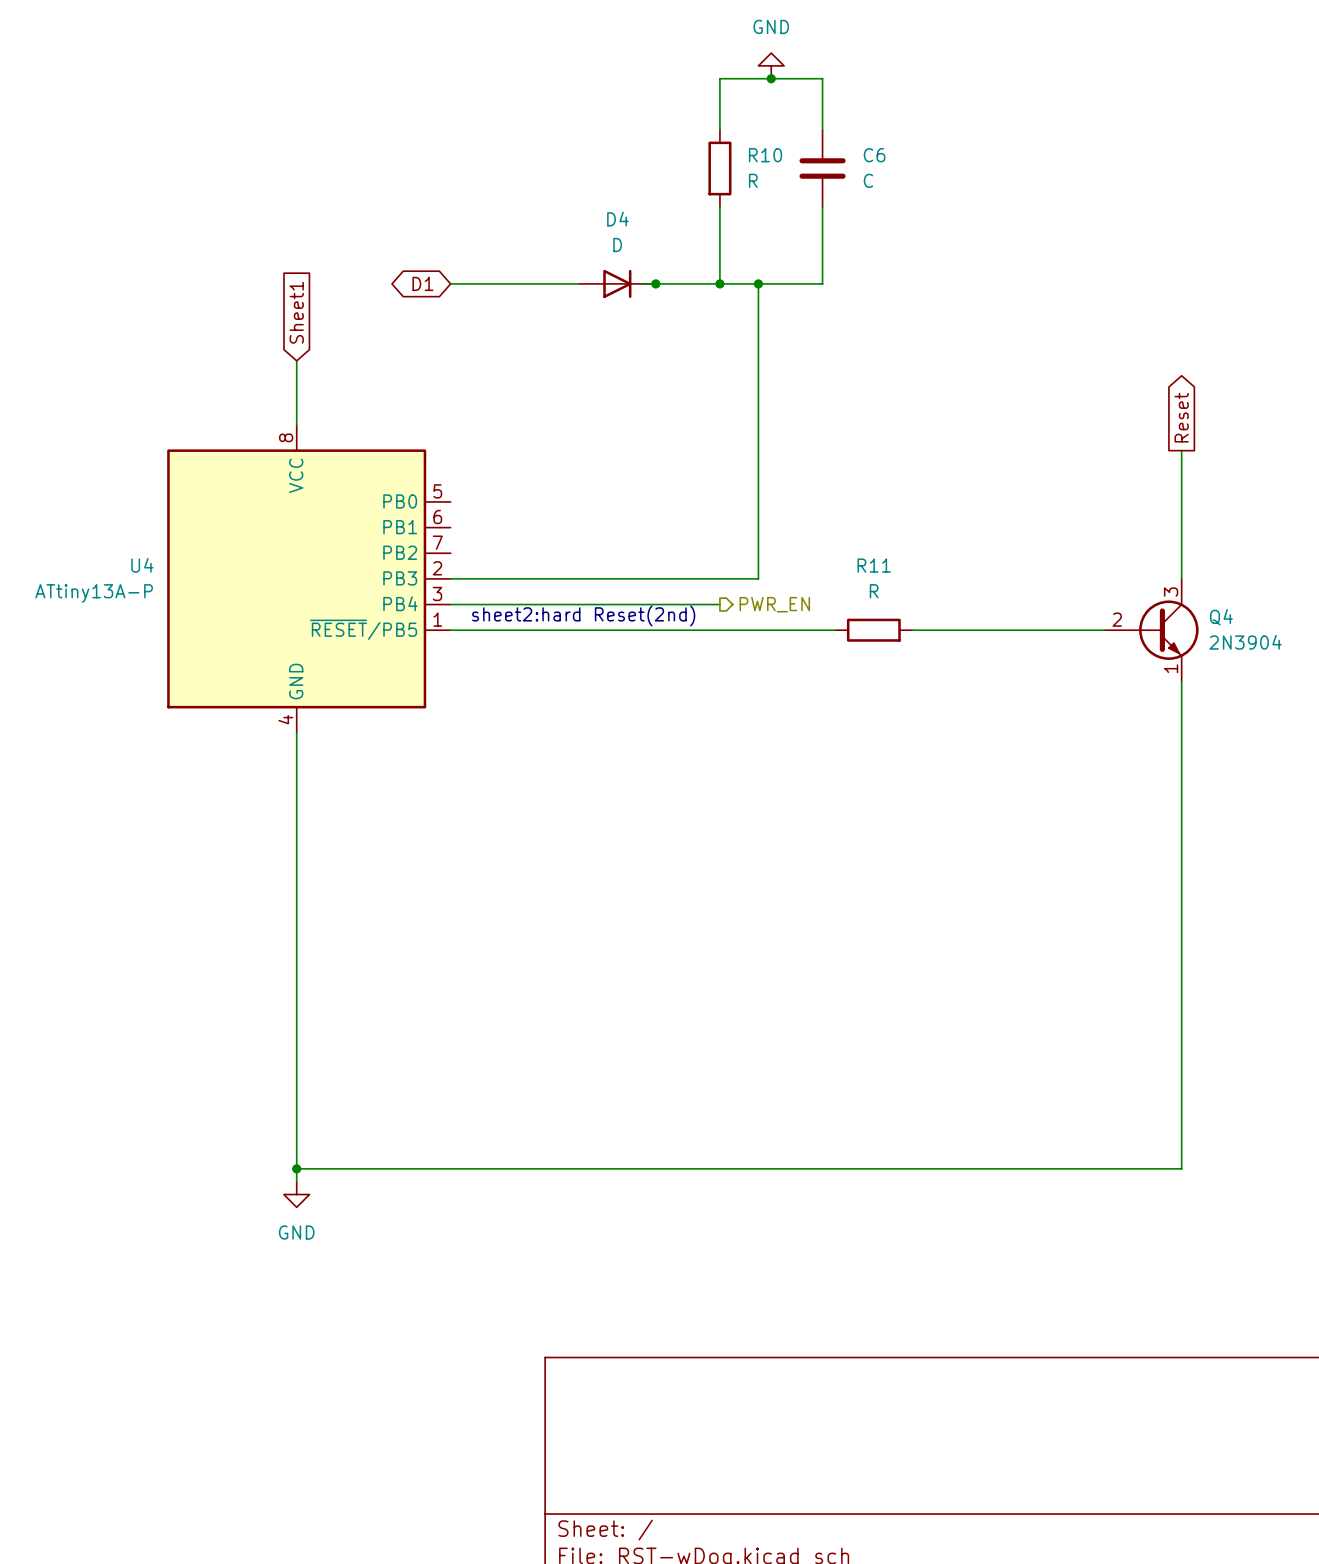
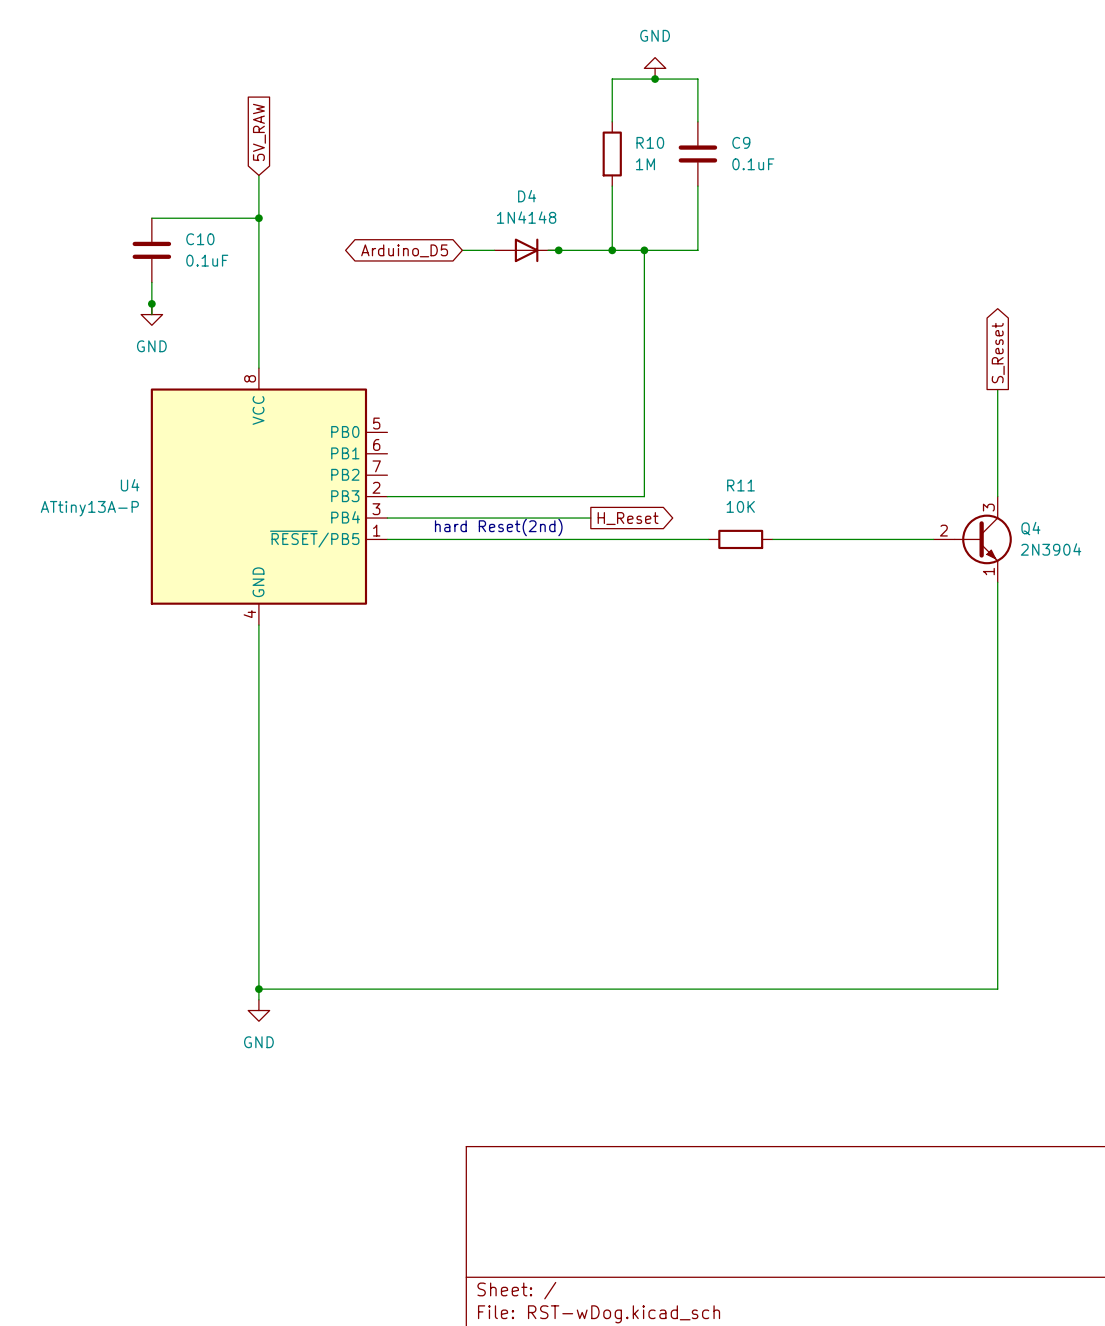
global label: none -> 5V_RAW (259, 132)
C6 name: C6 (874, 155) -> C9 (741, 142)
R10 value: R (753, 180) -> 1M (645, 164)
C6 value: C (868, 180) -> 0.1uF (753, 164)
wire: none -> (258, 175) (258, 314)
D4 value: D (617, 244) -> 1N4148 (526, 217)
wire: none -> (151, 218) (258, 218)
junction: none -> (258, 218)
C10: none -> 0.1uF (151, 250)
global label: D1 (422, 283) -> none
wire: (450, 283) (540, 283) -> none
global label: none -> Arduino_D5 (404, 250)
global label: Sheet1 (296, 312) -> none
wire: none -> (151, 282) (151, 314)
junction: none -> (151, 303)
power symbol: none -> GND (151, 314)
global label: Reset (1181, 417) -> S_Reset (998, 353)
R11 value: R (874, 591) -> 10K (740, 506)
wire: (694, 604) (719, 604) -> none
hierarchical label: PWR_EN (774, 604) -> none
global label: none -> H_Reset (628, 518)
text: sheet2:hard Reset(2nd) (583, 615) -> hard Reset(2nd) (498, 527)

